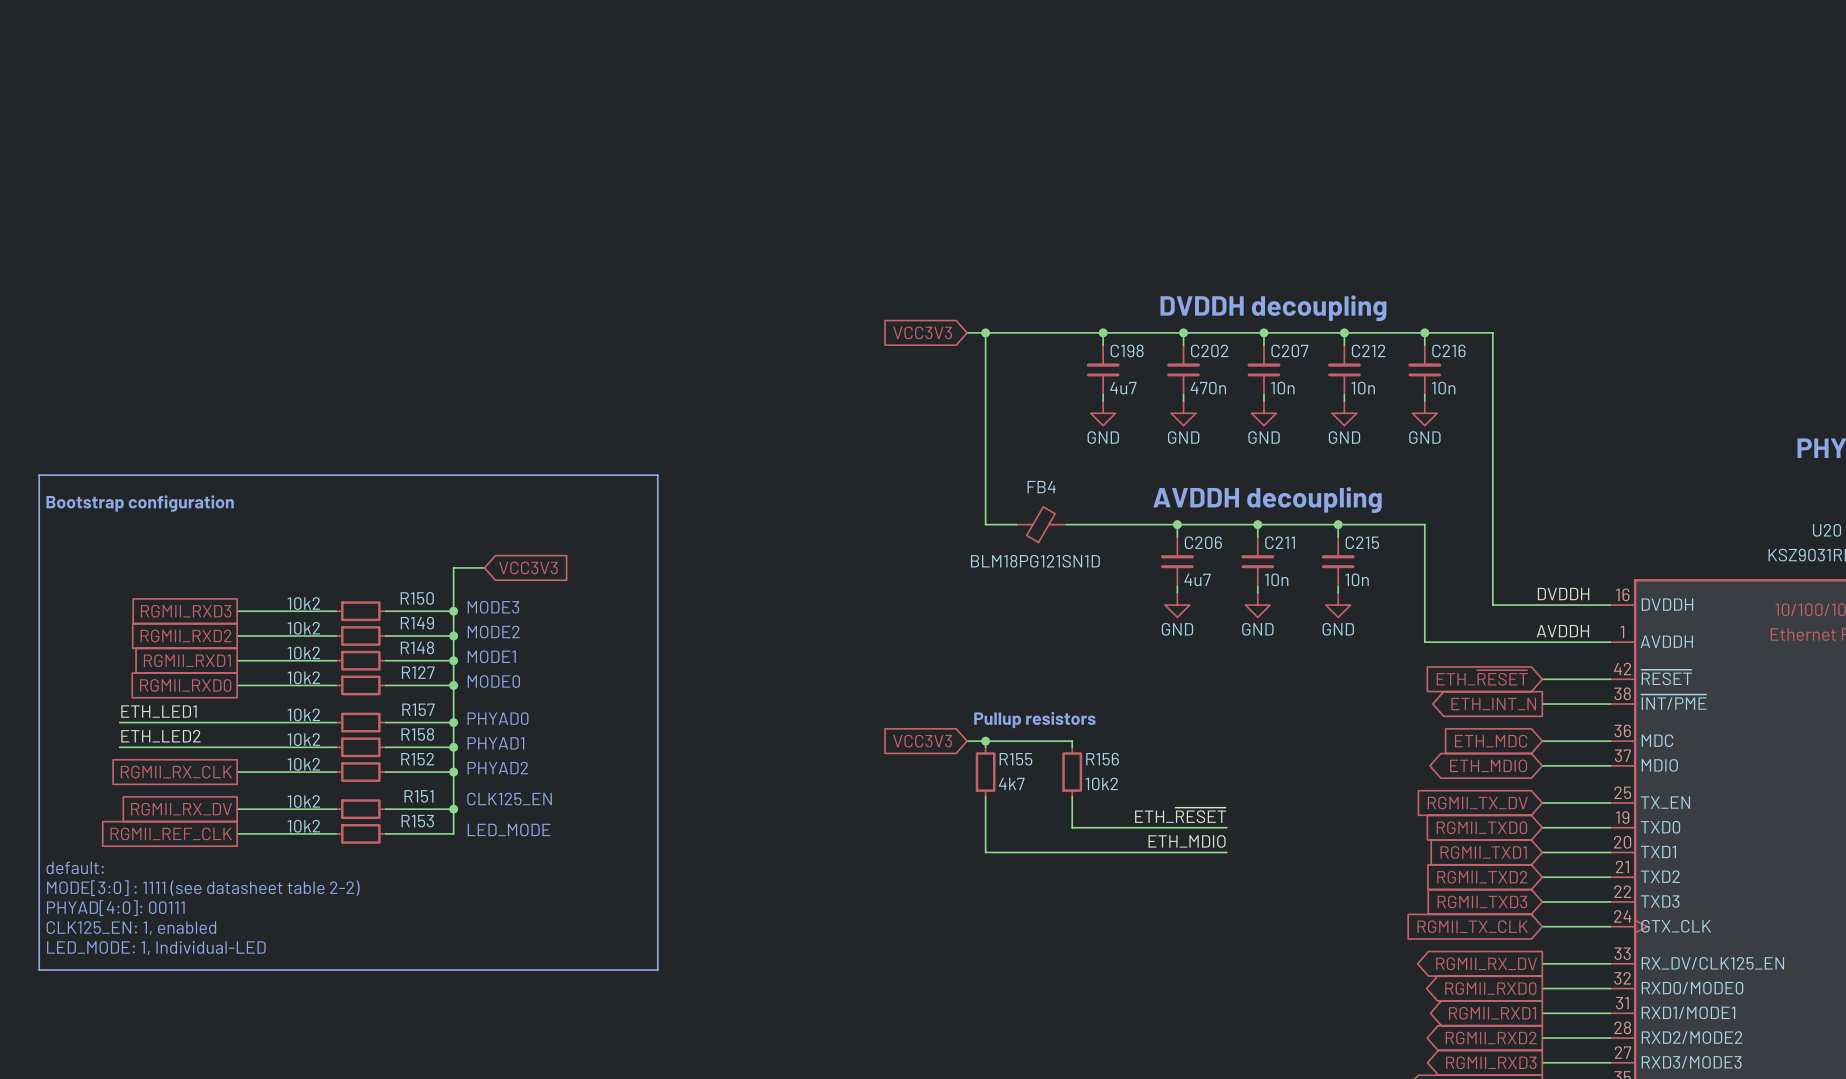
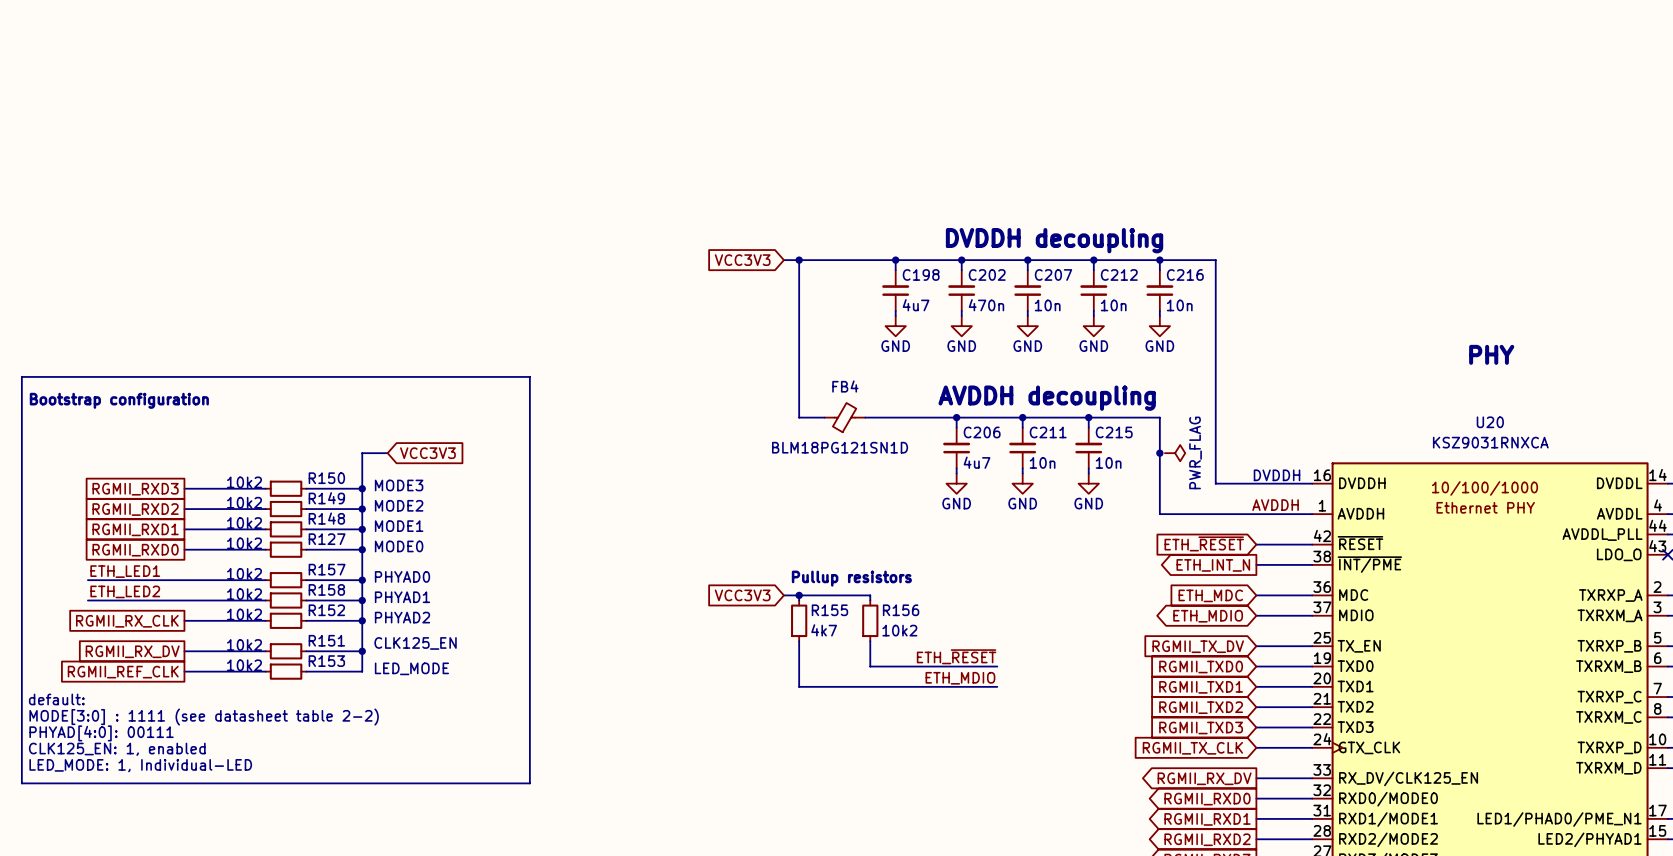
junction: none -> (1159, 453)
power symbol: none -> PWR_FLAG (1175, 453)
label: DVDDH (1563, 594) -> none
text: none -> DVDDH (1277, 475)

